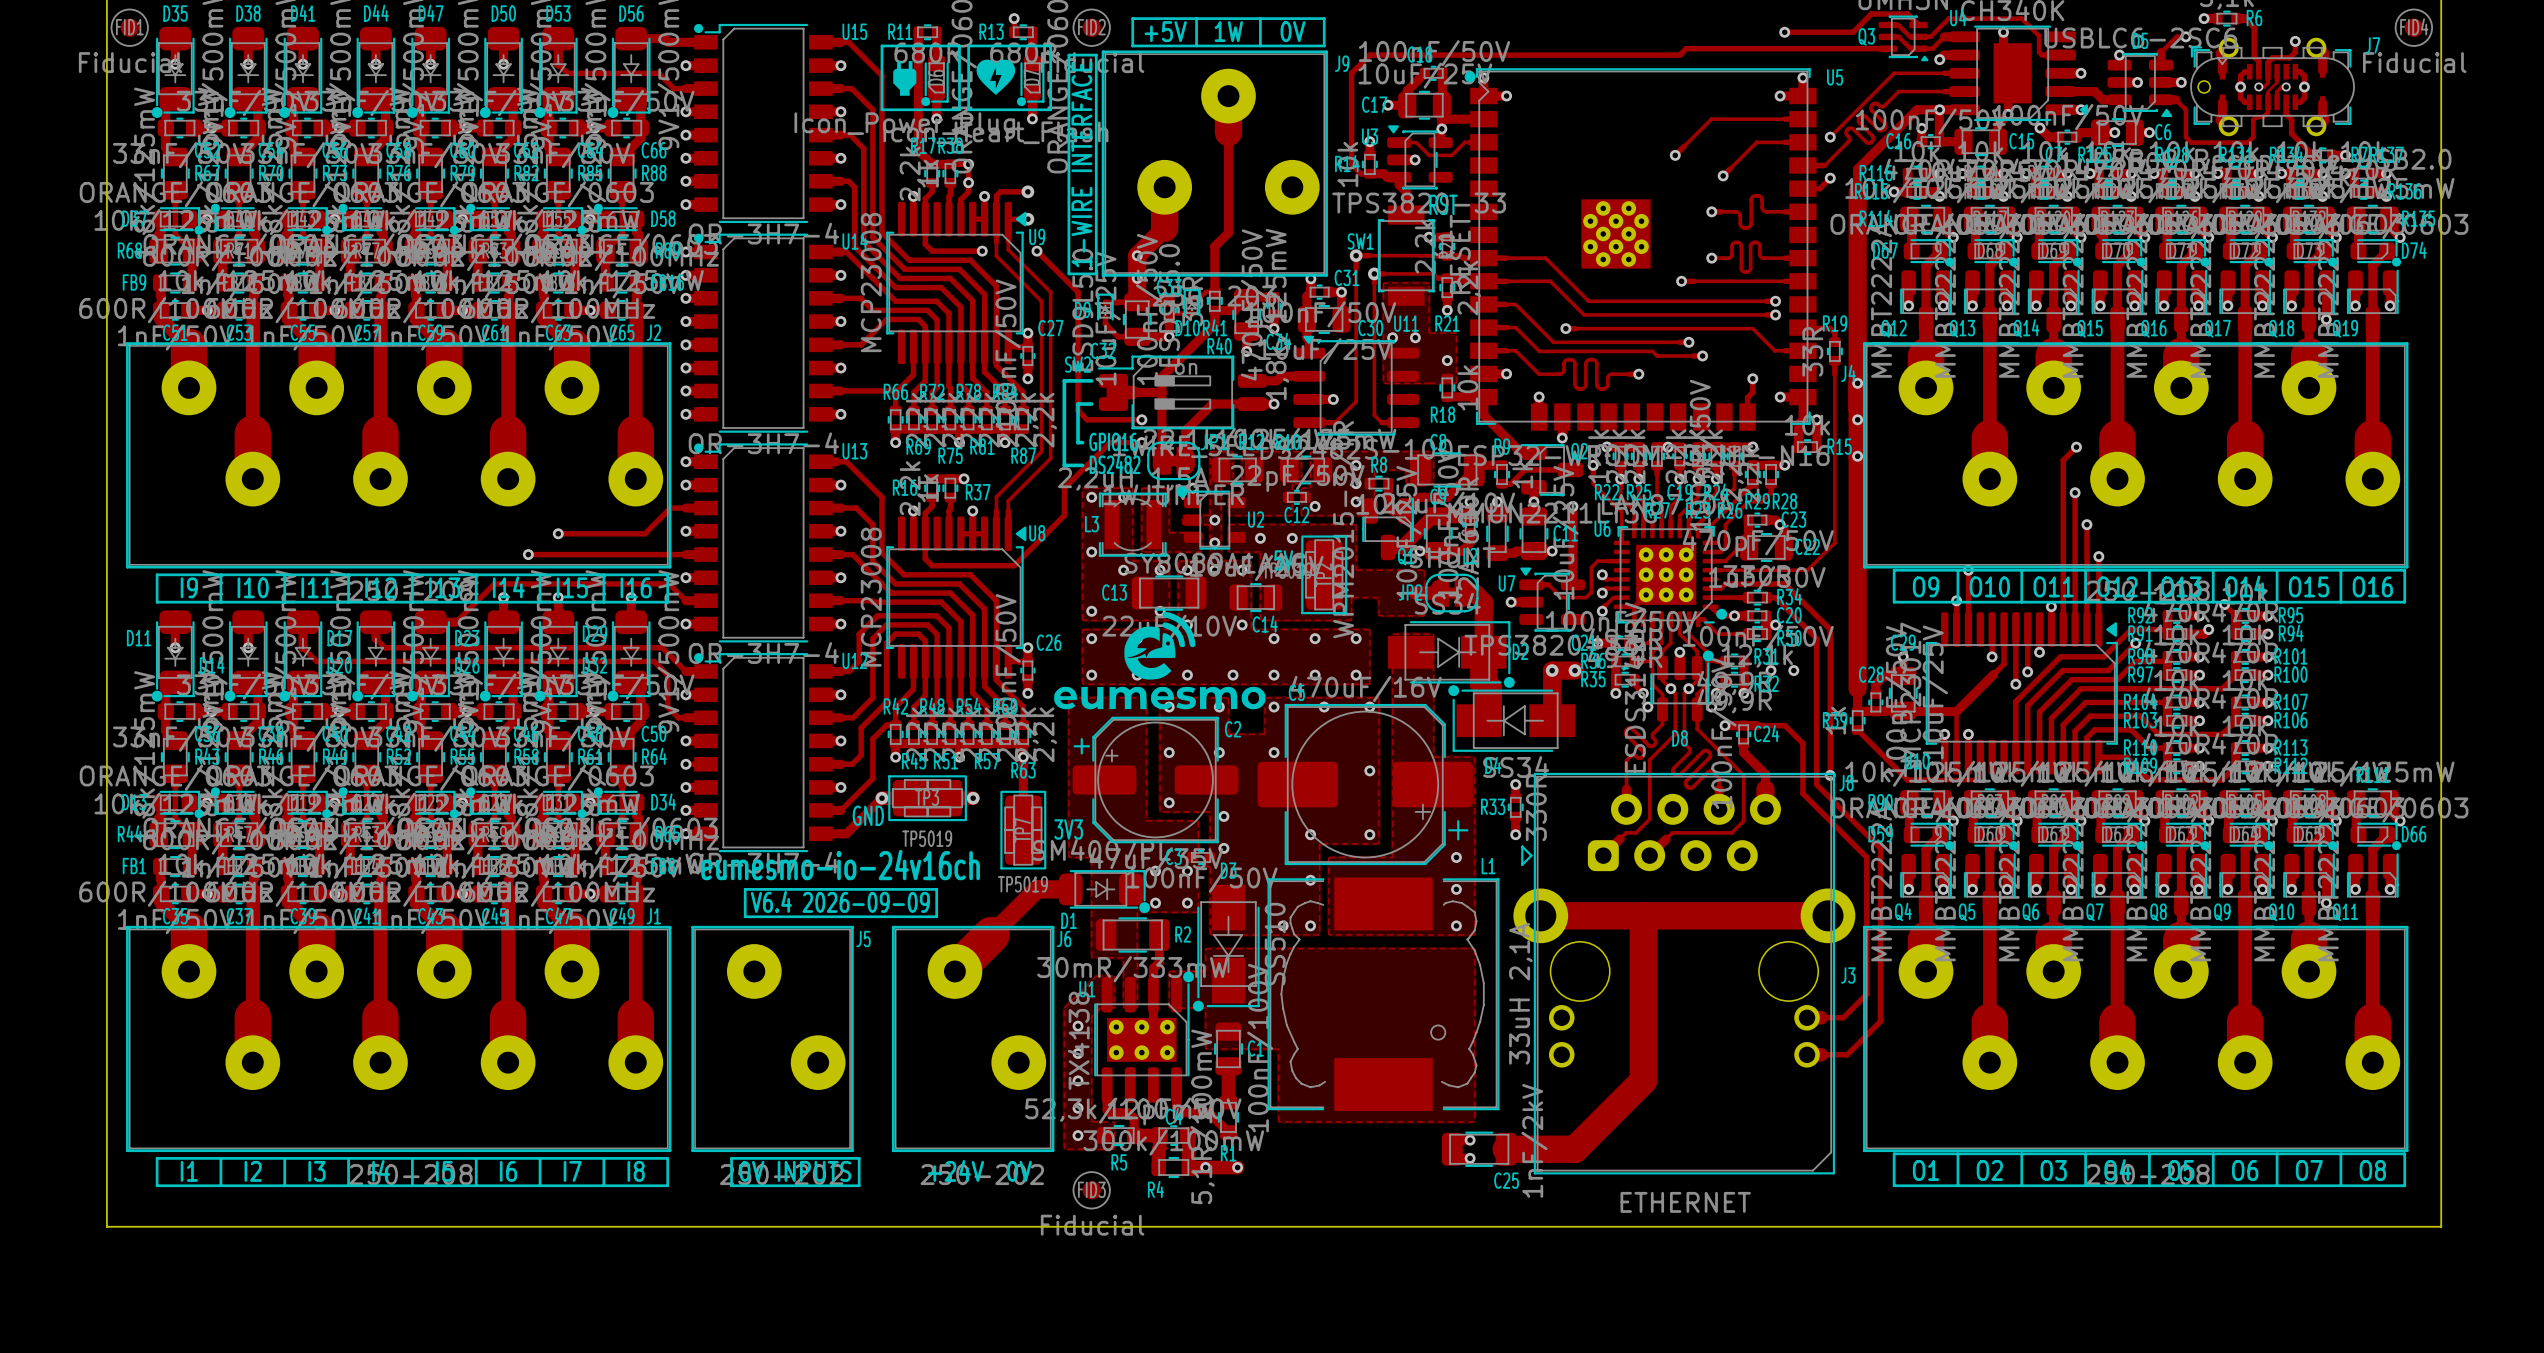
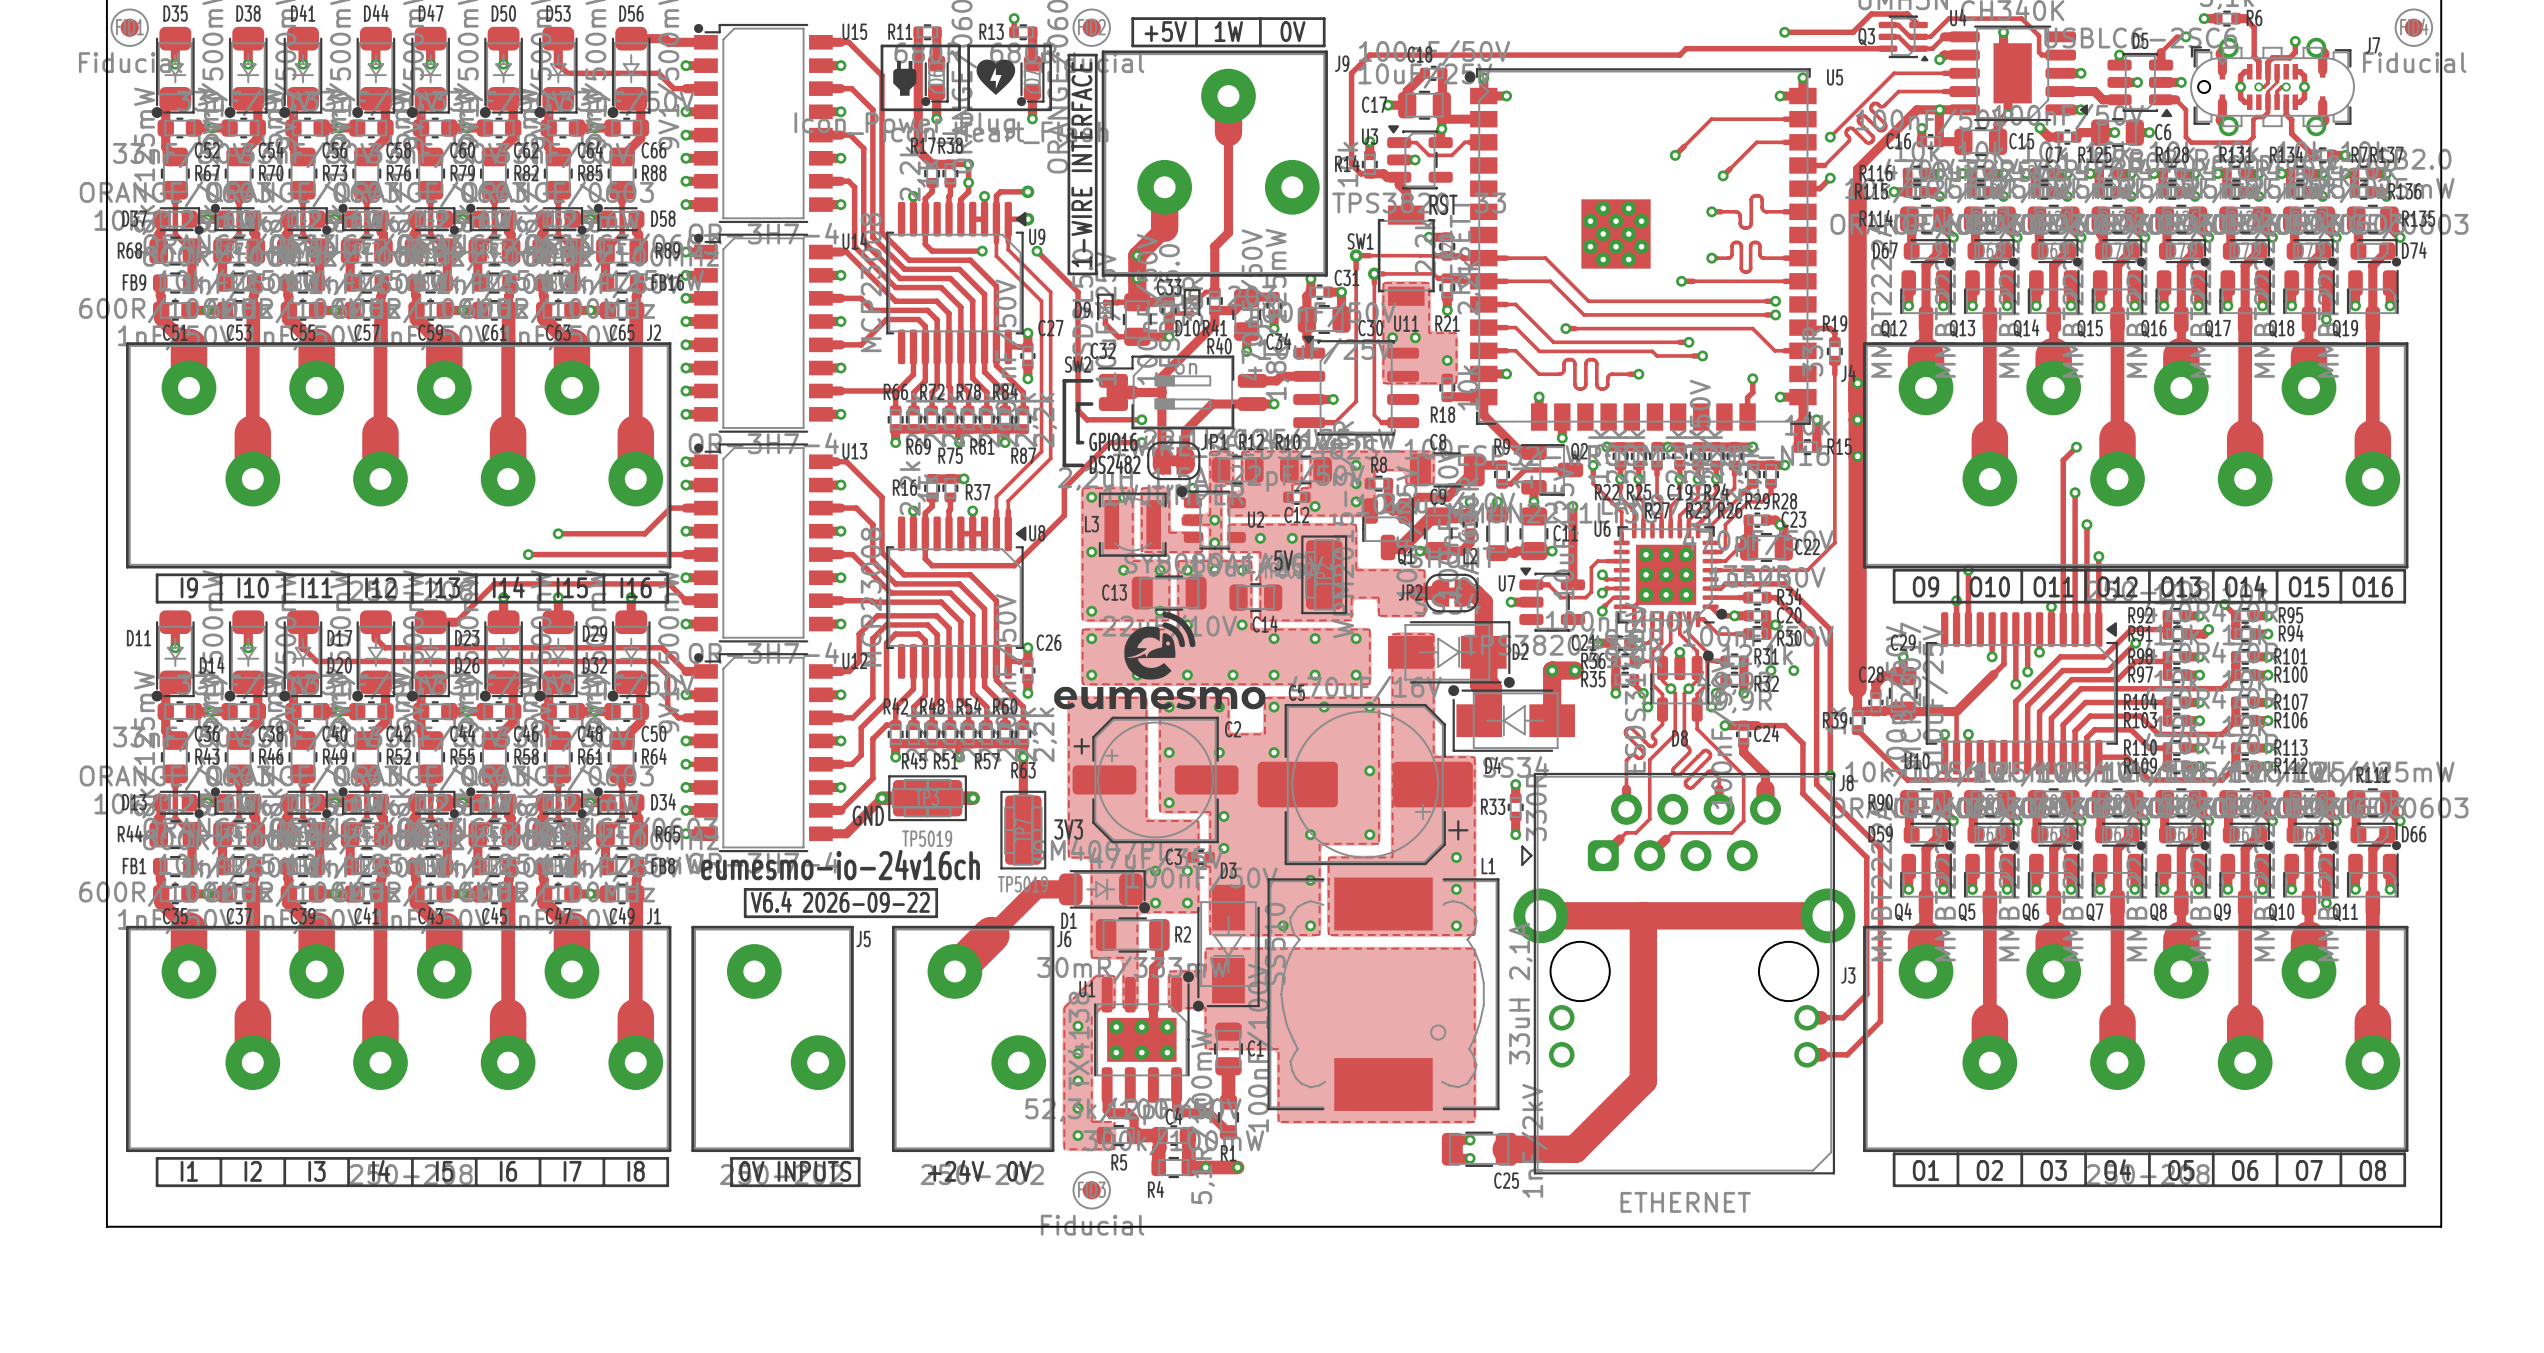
text: V6.4 2026-09-09 (840, 901) -> V6.4 2026-09-22 (840, 901)

